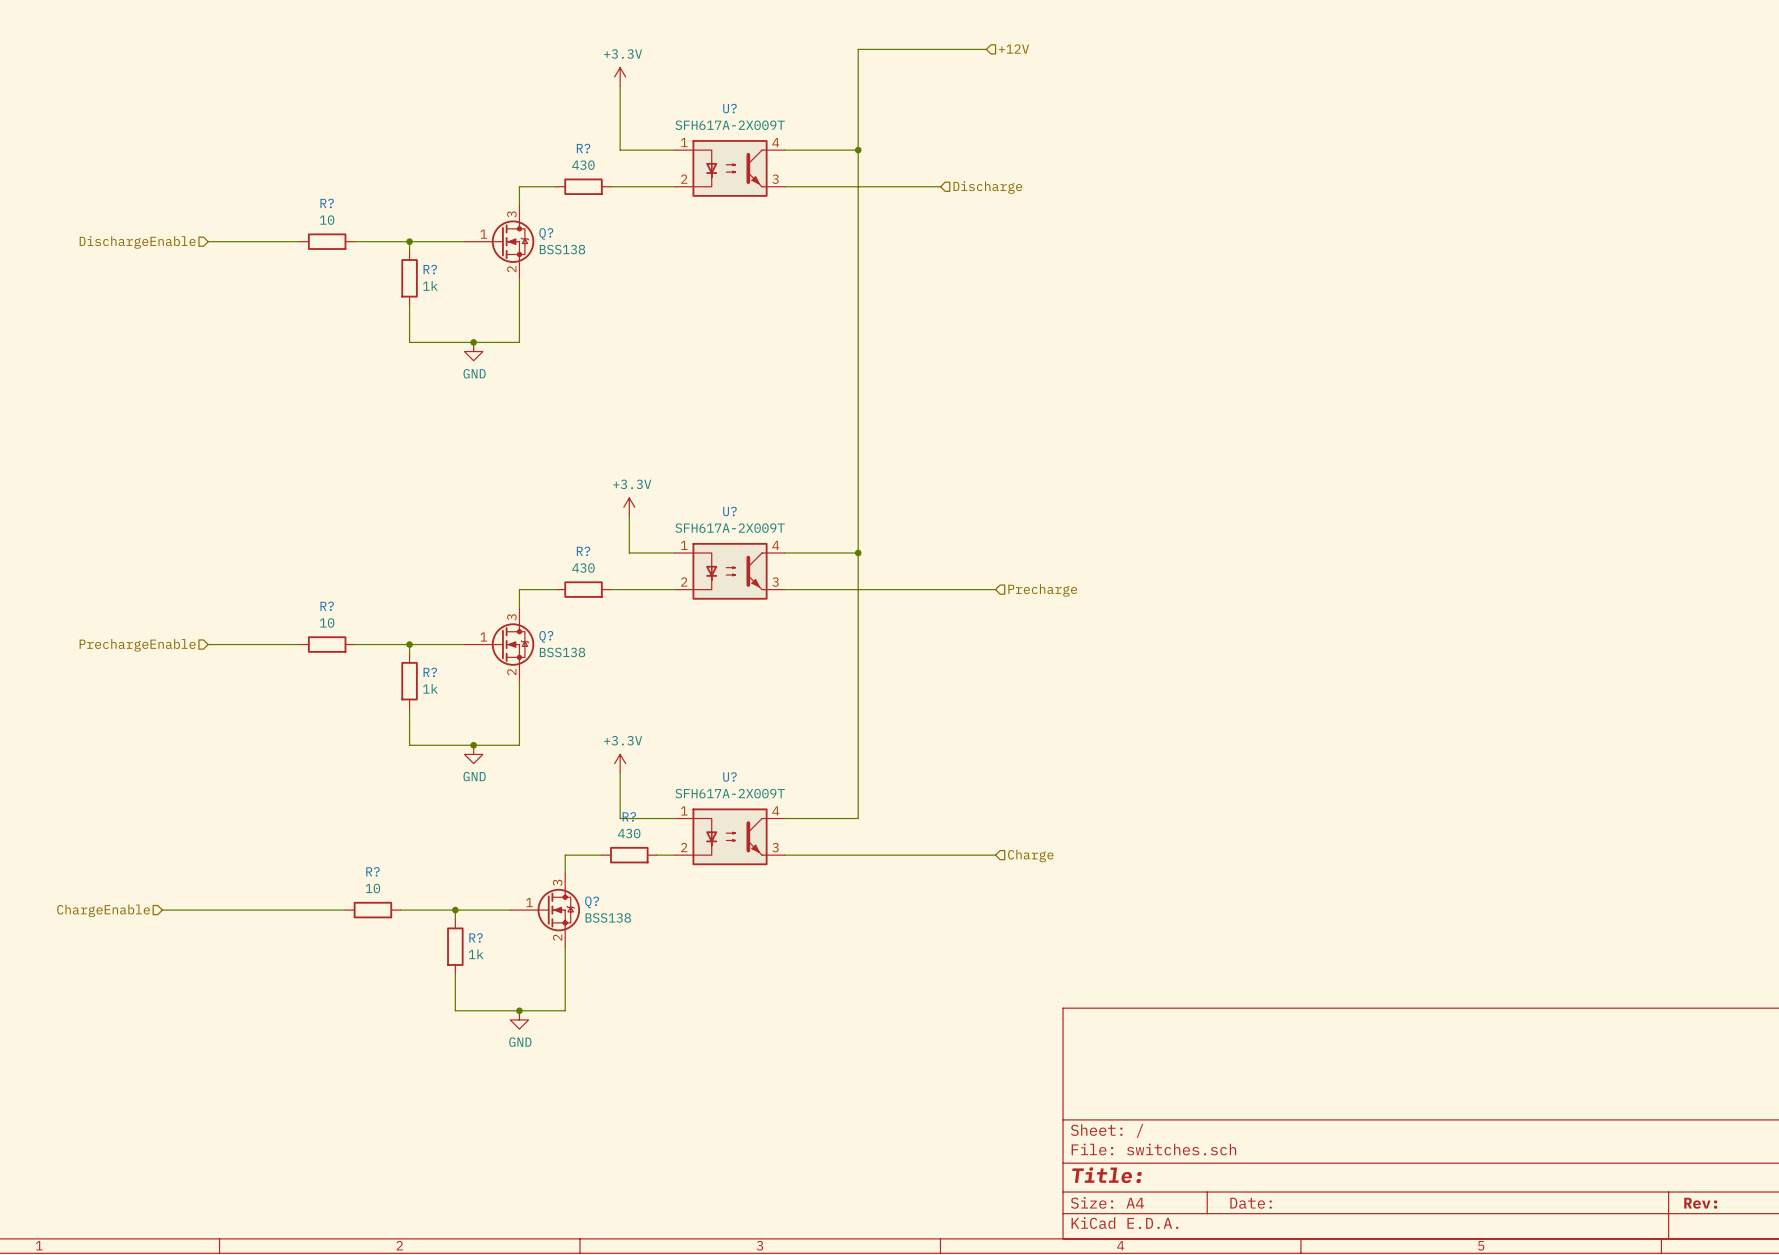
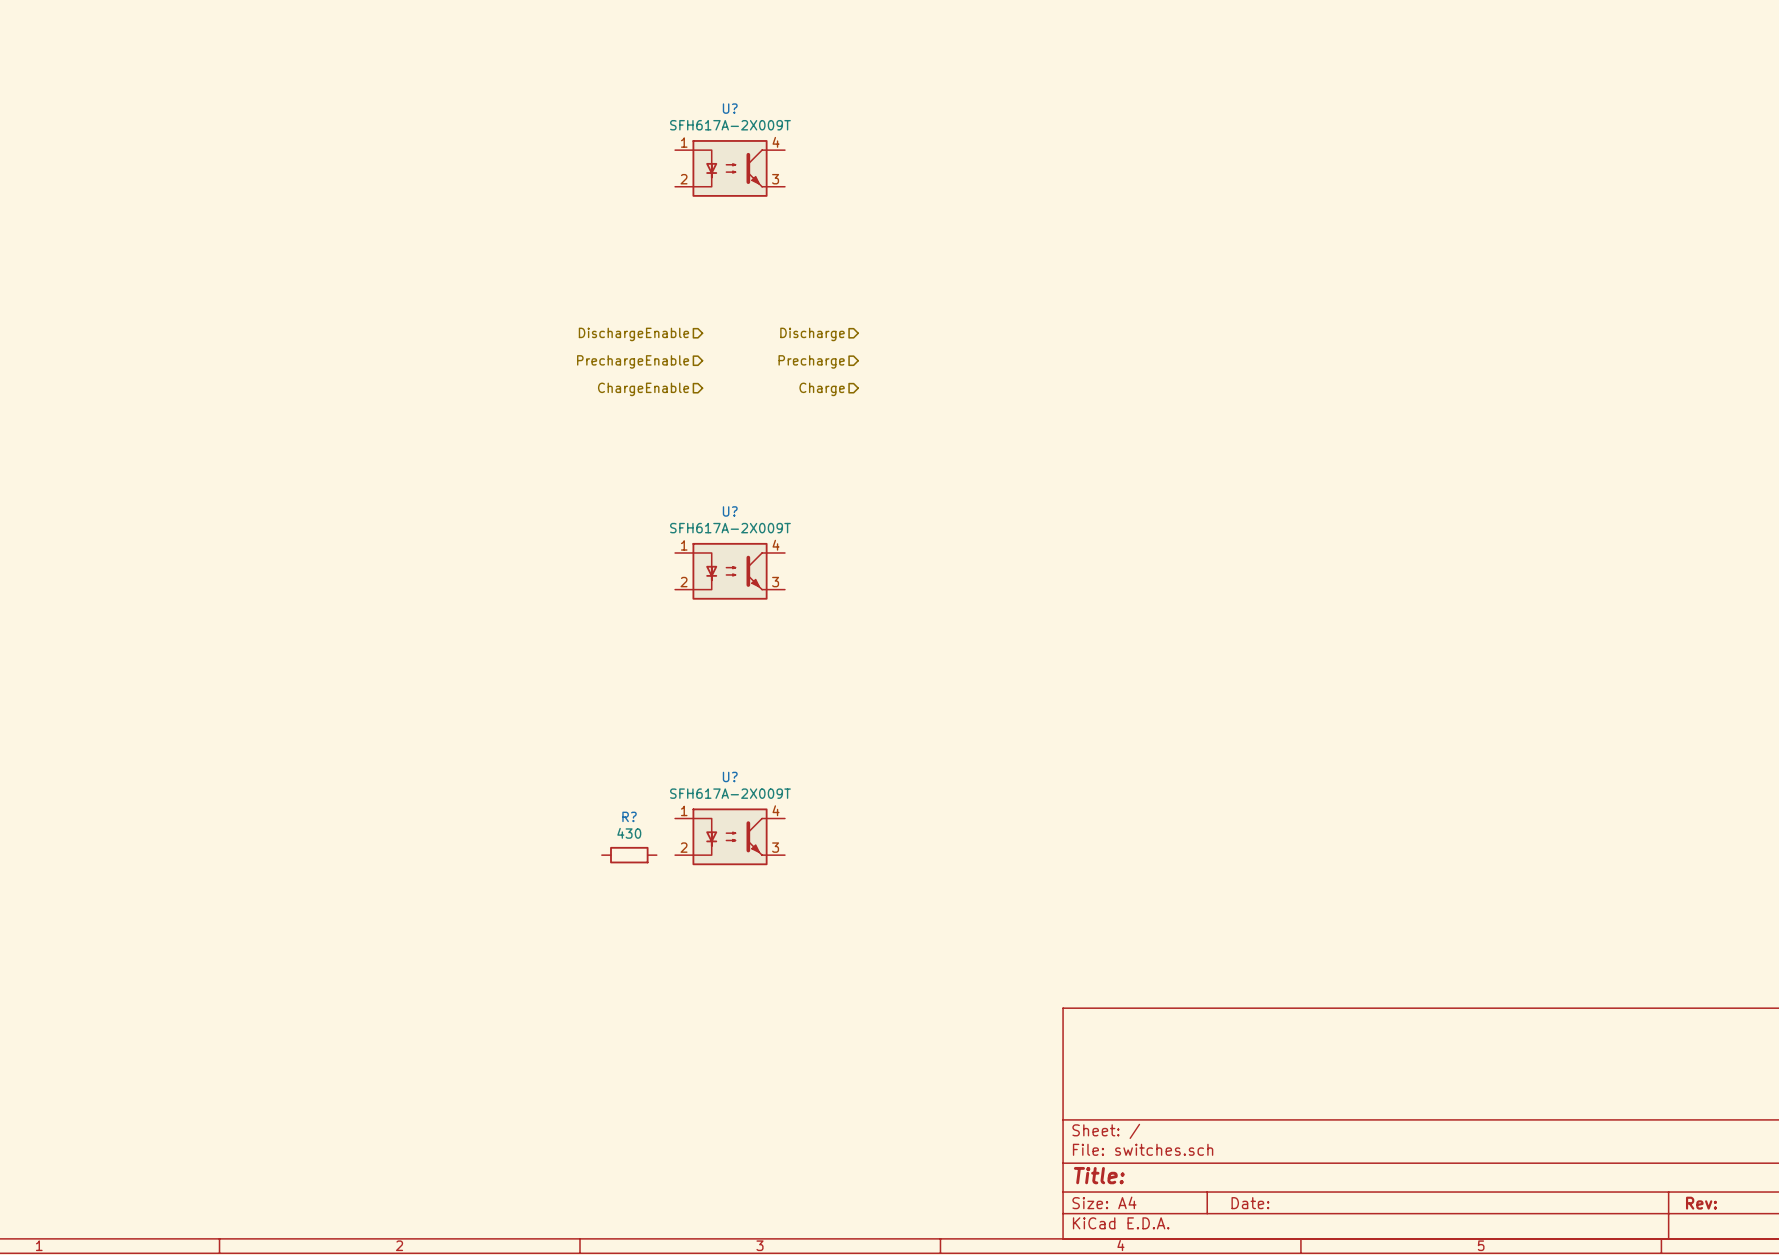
hierarchical label: +12V (1013, 48) -> none
wire: (986, 49) (858, 49) (858, 818) (784, 818) -> none
power symbol: +3.3V (620, 76) -> none
wire: (620, 86) (620, 150) (675, 150) -> none
wire: (784, 150) (858, 150) -> none
junction: (858, 150) -> none
wire: (556, 186) (519, 186) (519, 205) -> none
R?: 430 (583, 186) -> none
wire: (610, 186) (675, 186) -> none
wire: (784, 186) (940, 186) -> none
hierarchical label: Discharge (987, 187) -> none
wire: (208, 241) (299, 241) -> none
R?: 10 (327, 241) -> none
wire: (354, 241) (464, 241) -> none
wire: (409, 241) (409, 250) -> none
junction: (409, 241) -> none
Q?: BSS138 (499, 241) -> none
hierarchical label: DischargeEnable (137, 242) -> none
R?: 1k (409, 278) -> none
wire: (519, 278) (519, 342) (409, 342) (409, 305) -> none
hierarchical label: none -> DischargeEnable (633, 334)
hierarchical label: none -> Discharge (812, 334)
junction: (473, 342) -> none
power symbol: GND (473, 351) -> none
hierarchical label: none -> PrechargeEnable (633, 361)
hierarchical label: none -> Precharge (811, 361)
hierarchical label: none -> ChargeEnable (643, 389)
hierarchical label: none -> Charge (822, 389)
power symbol: +3.3V (629, 507) -> none
wire: (629, 516) (629, 552) (675, 552) -> none
wire: (784, 552) (858, 552) -> none
junction: (858, 552) -> none
wire: (556, 589) (519, 589) (519, 607) -> none
R?: 430 (583, 589) -> none
wire: (610, 589) (675, 589) -> none
wire: (784, 589) (995, 589) -> none
hierarchical label: Precharge (1042, 590) -> none
wire: (208, 644) (299, 644) -> none
R?: 10 (327, 644) -> none
wire: (354, 644) (464, 644) -> none
wire: (409, 644) (409, 653) -> none
junction: (409, 644) -> none
Q?: BSS138 (499, 644) -> none
hierarchical label: PrechargeEnable (137, 645) -> none
R?: 1k (409, 681) -> none
wire: (519, 681) (519, 745) (409, 745) (409, 708) -> none
junction: (473, 745) -> none
power symbol: GND (473, 754) -> none
power symbol: +3.3V (620, 763) -> none
wire: (620, 772) (620, 818) (675, 818) -> none
wire: (601, 855) (565, 855) (565, 873) -> none
wire: (656, 855) (675, 855) -> none
wire: (784, 855) (995, 855) -> none
hierarchical label: Charge (1030, 855) -> none
hierarchical label: ChargeEnable (103, 910) -> none
wire: (162, 910) (345, 910) -> none
R?: 10 (372, 910) -> none
wire: (400, 910) (510, 910) -> none
wire: (455, 910) (455, 919) -> none
junction: (455, 910) -> none
Q?: BSS138 (545, 910) -> none
R?: 1k (455, 946) -> none
wire: (565, 946) (565, 1010) (455, 1010) (455, 974) -> none
junction: (519, 1010) -> none
power symbol: GND (519, 1019) -> none

